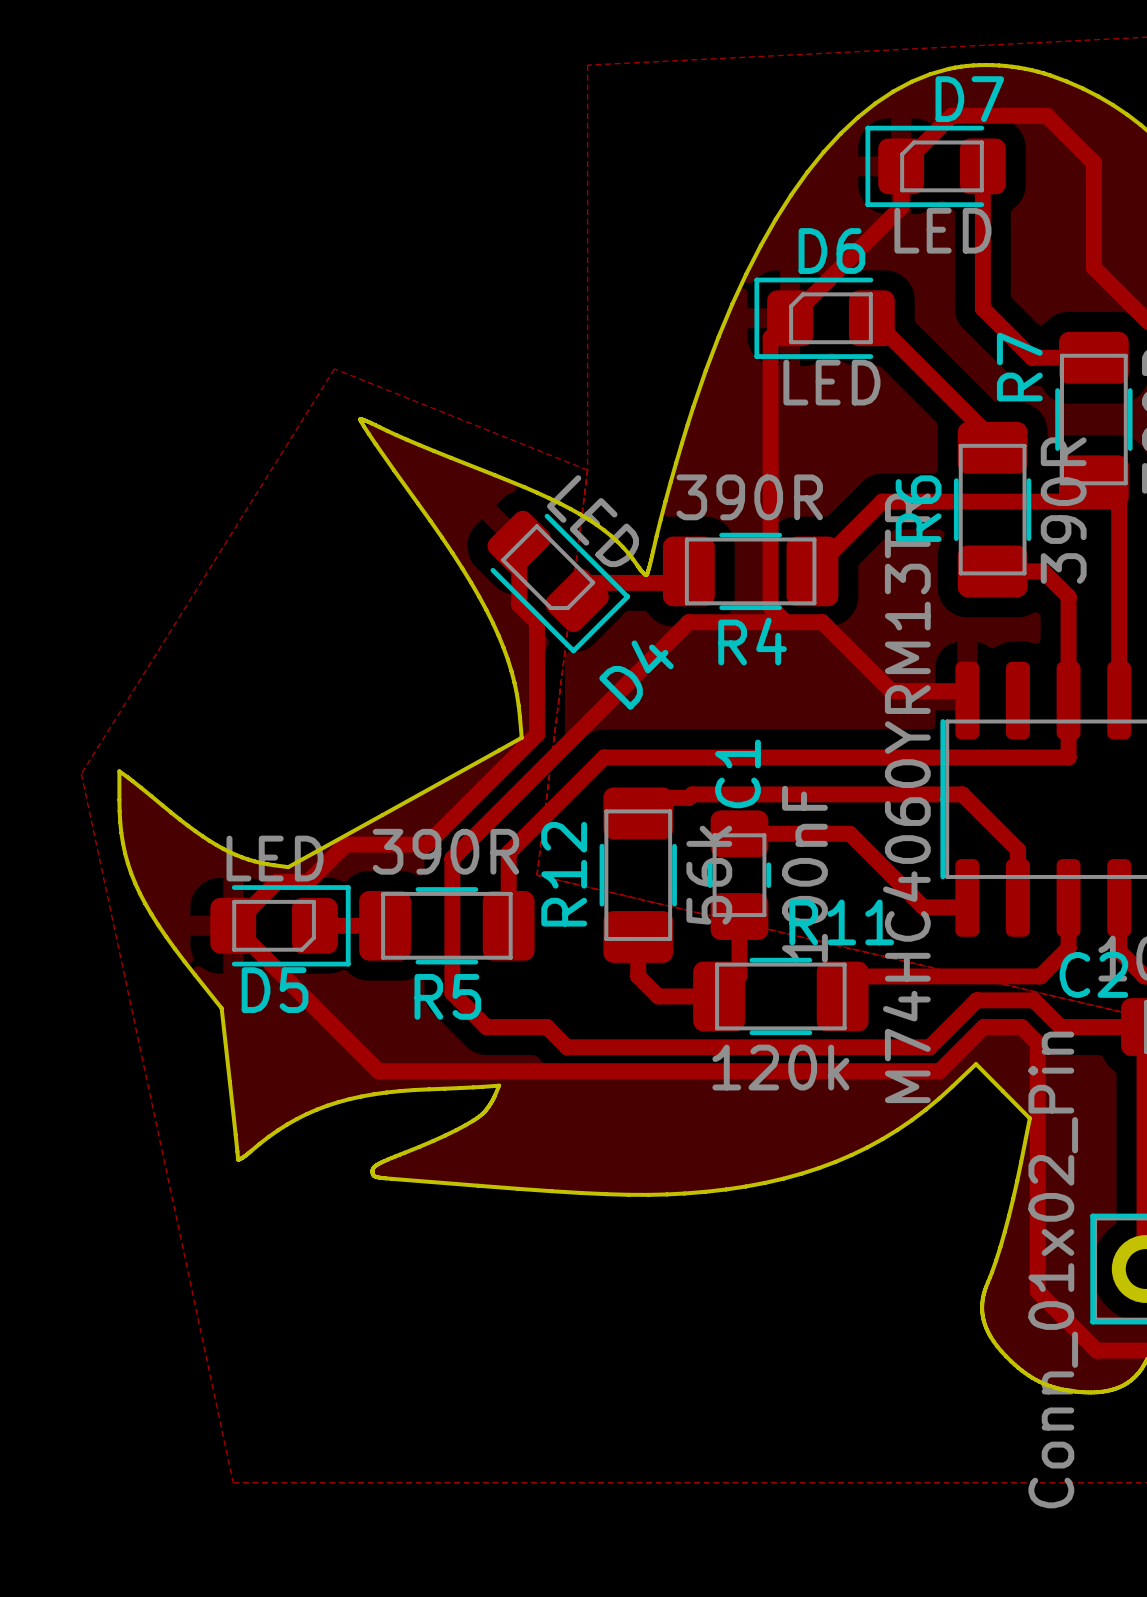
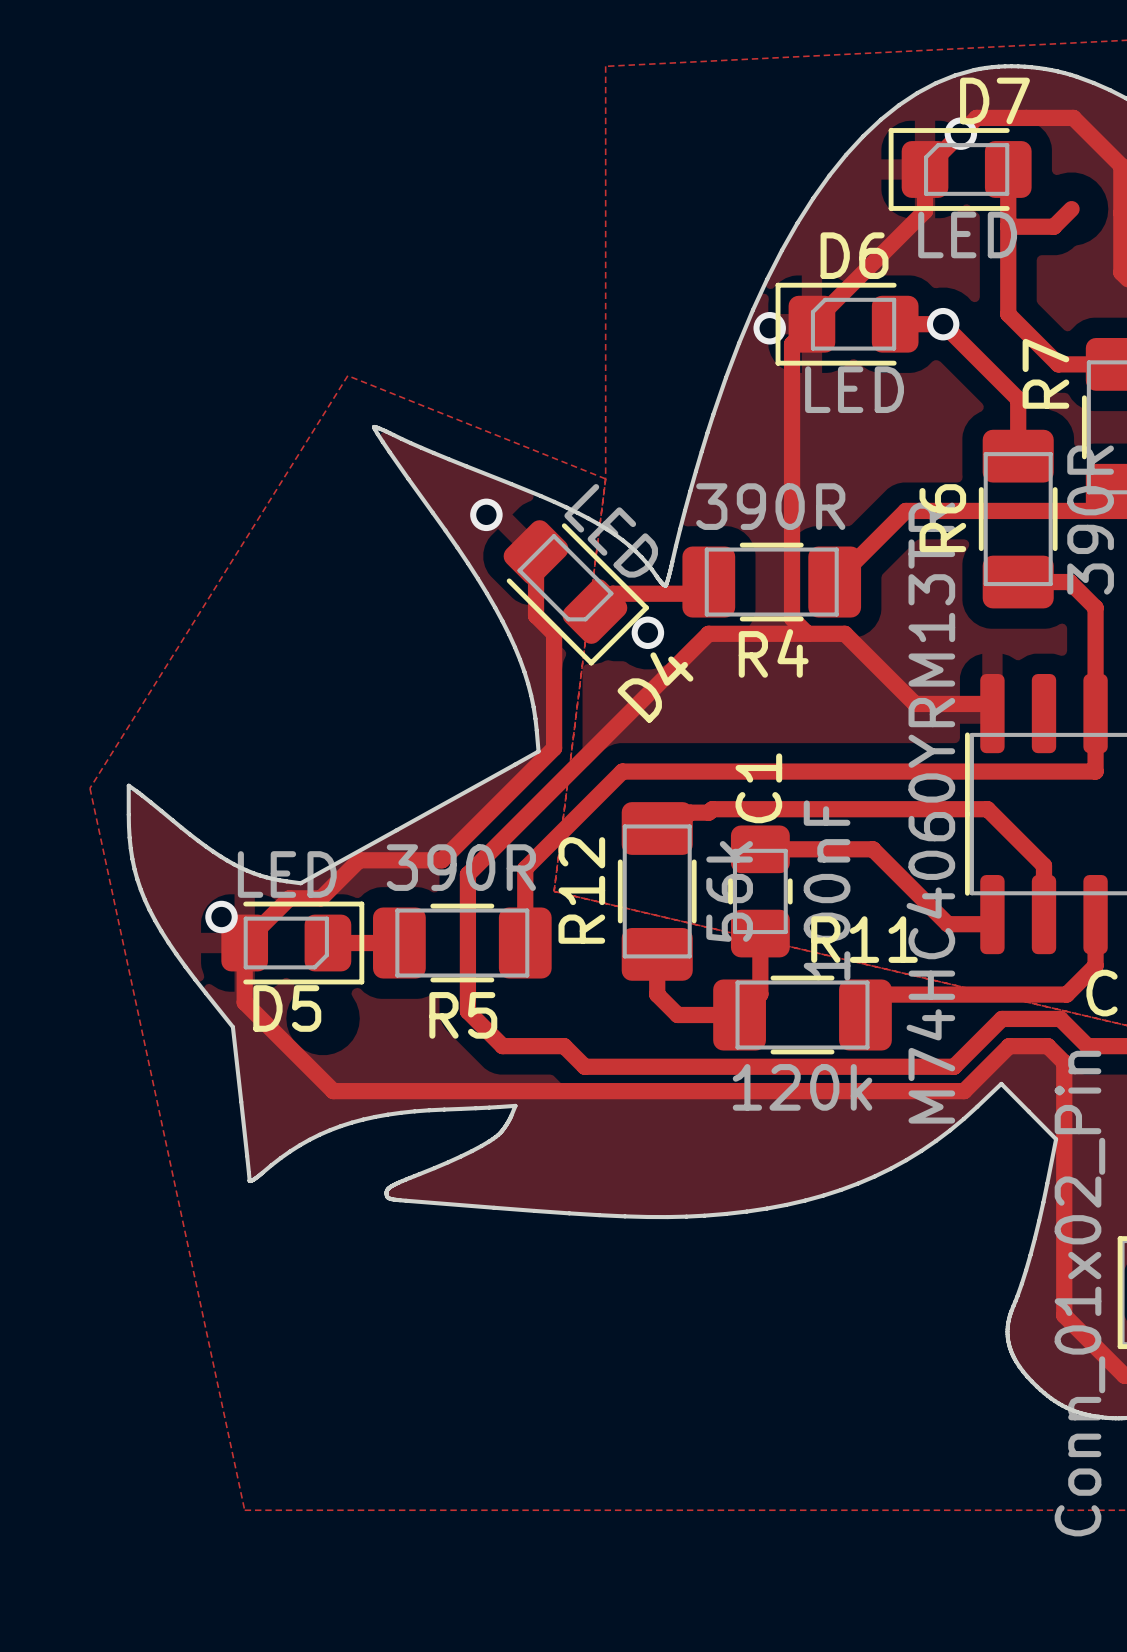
via: none -> (960, 133)
track: none -> (1071, 209) (1053, 226) (1008, 226)
track: (871, 318) (992, 439) -> (895, 324) (943, 324) (1018, 399) (1018, 447)
via: none -> (943, 324)
via: none -> (769, 328)
via: none -> (486, 514)
via: none -> (647, 632)
via: none -> (221, 917)
track: (233, 925) (378, 1071) -> (244, 943) (244, 1002) (333, 1091) (392, 1091)

